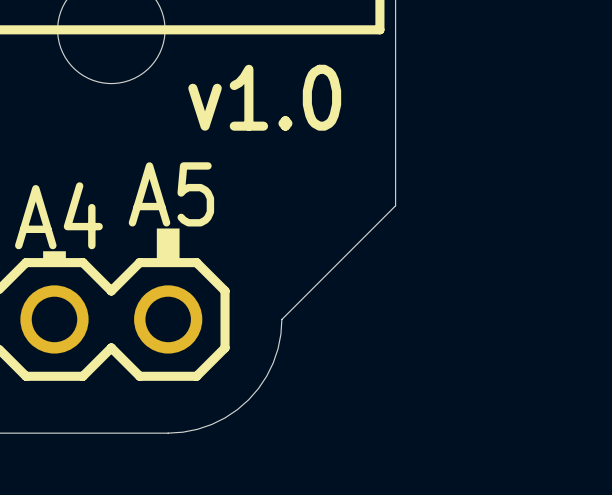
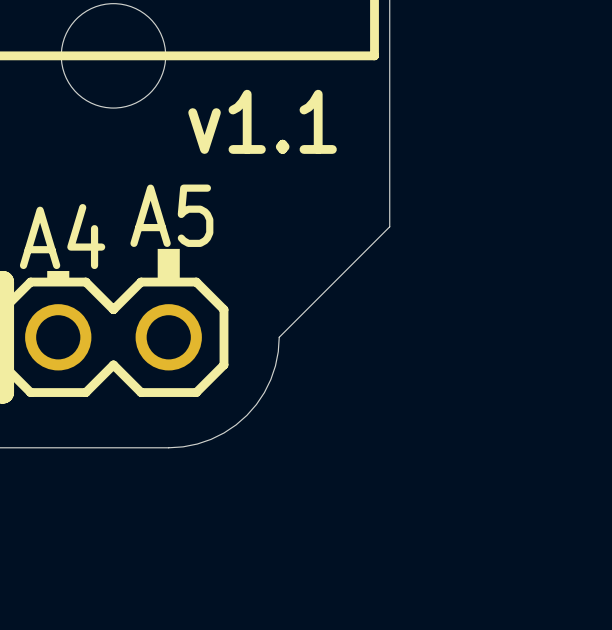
text: v1.0 (264, 97) -> v1.1 (262, 121)

